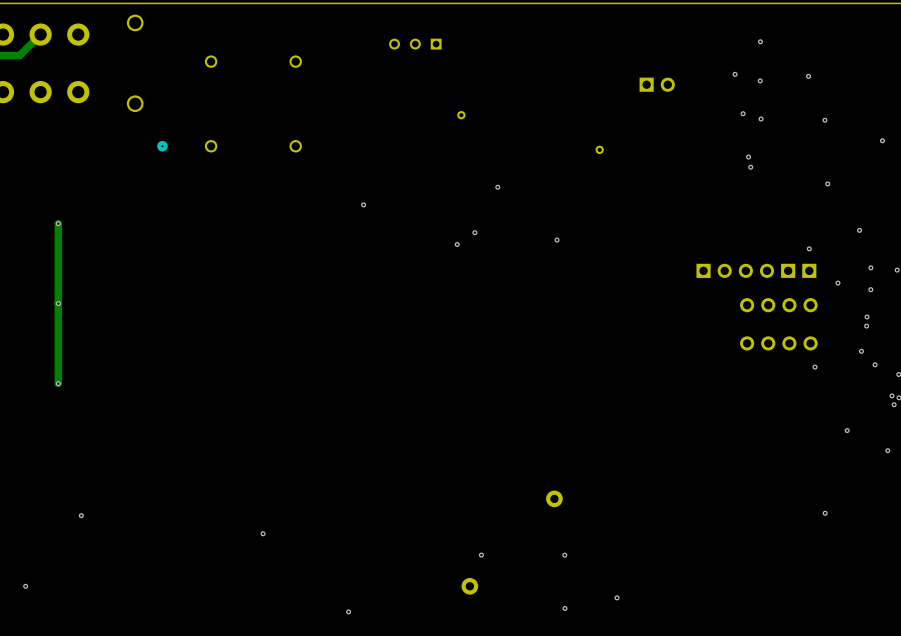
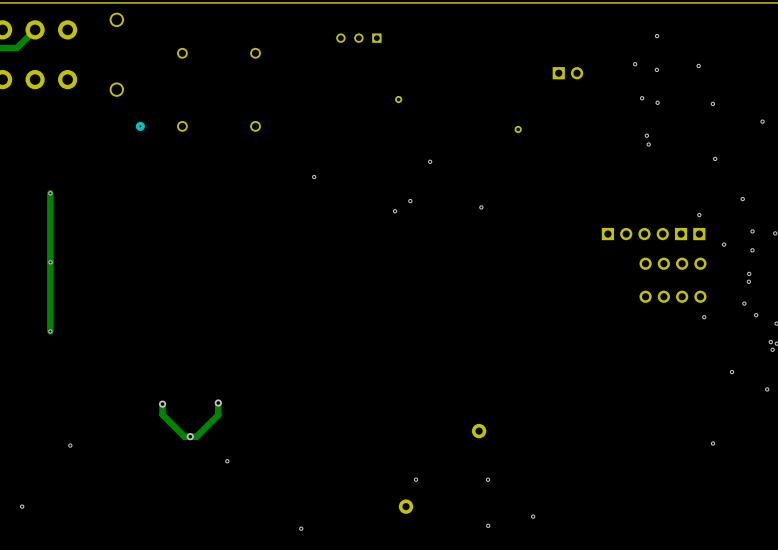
track: none -> (218, 403) (218, 415) (196, 436) (184, 436) (162, 414) (162, 404)
via: none -> (218, 403)
via: none -> (162, 404)
via: none -> (190, 436)

